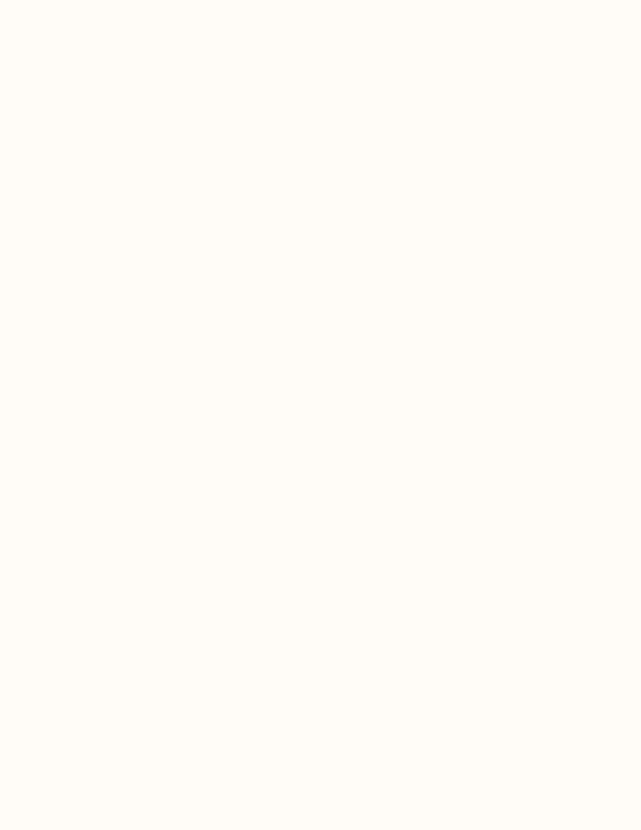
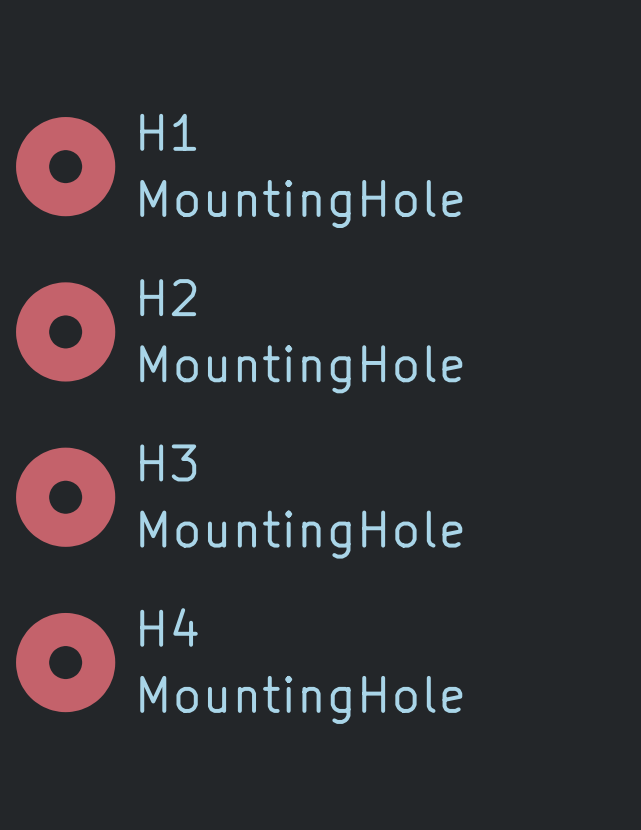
H1: none -> MountingHole (65, 166)
H2: none -> MountingHole (65, 331)
H3: none -> MountingHole (65, 497)
H4: none -> MountingHole (65, 662)

